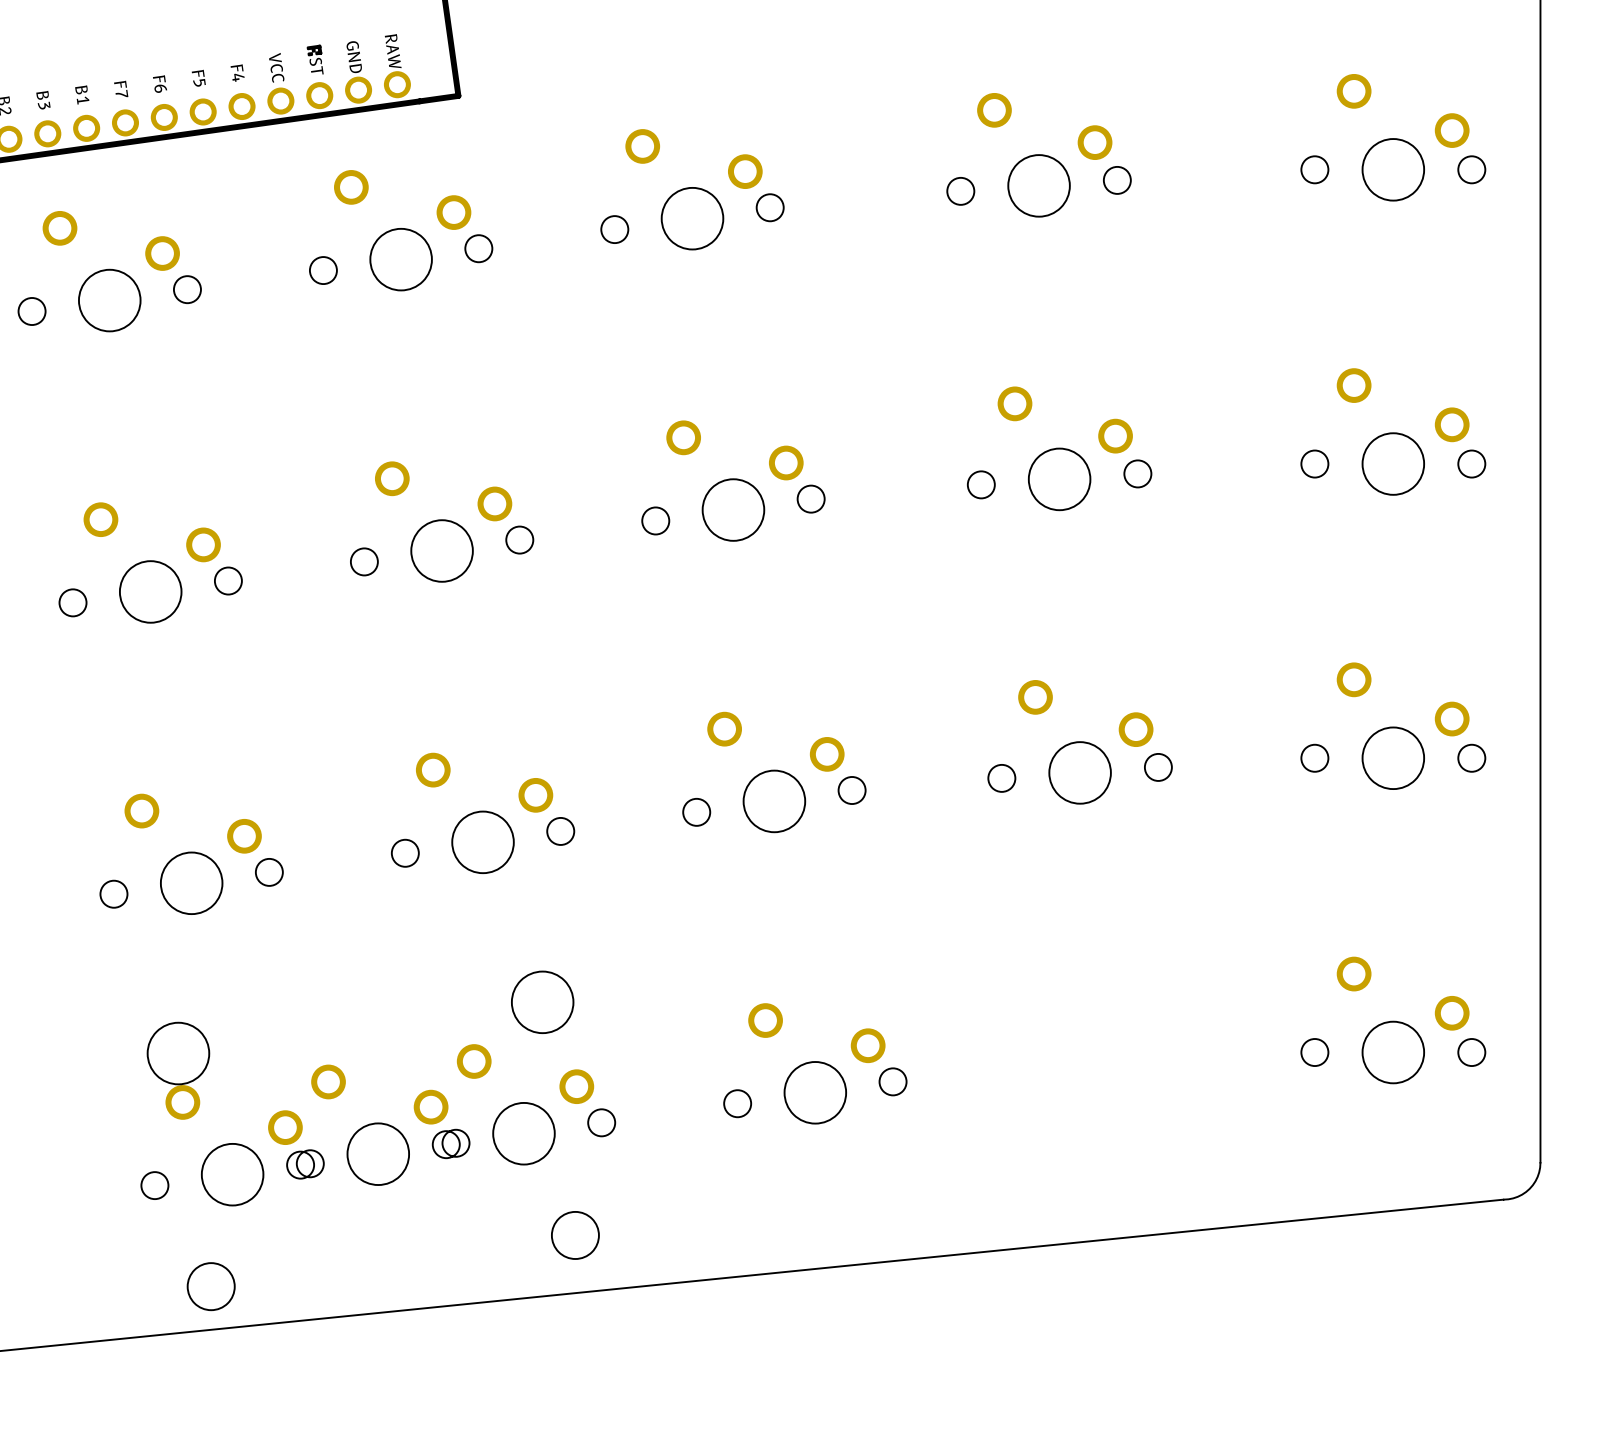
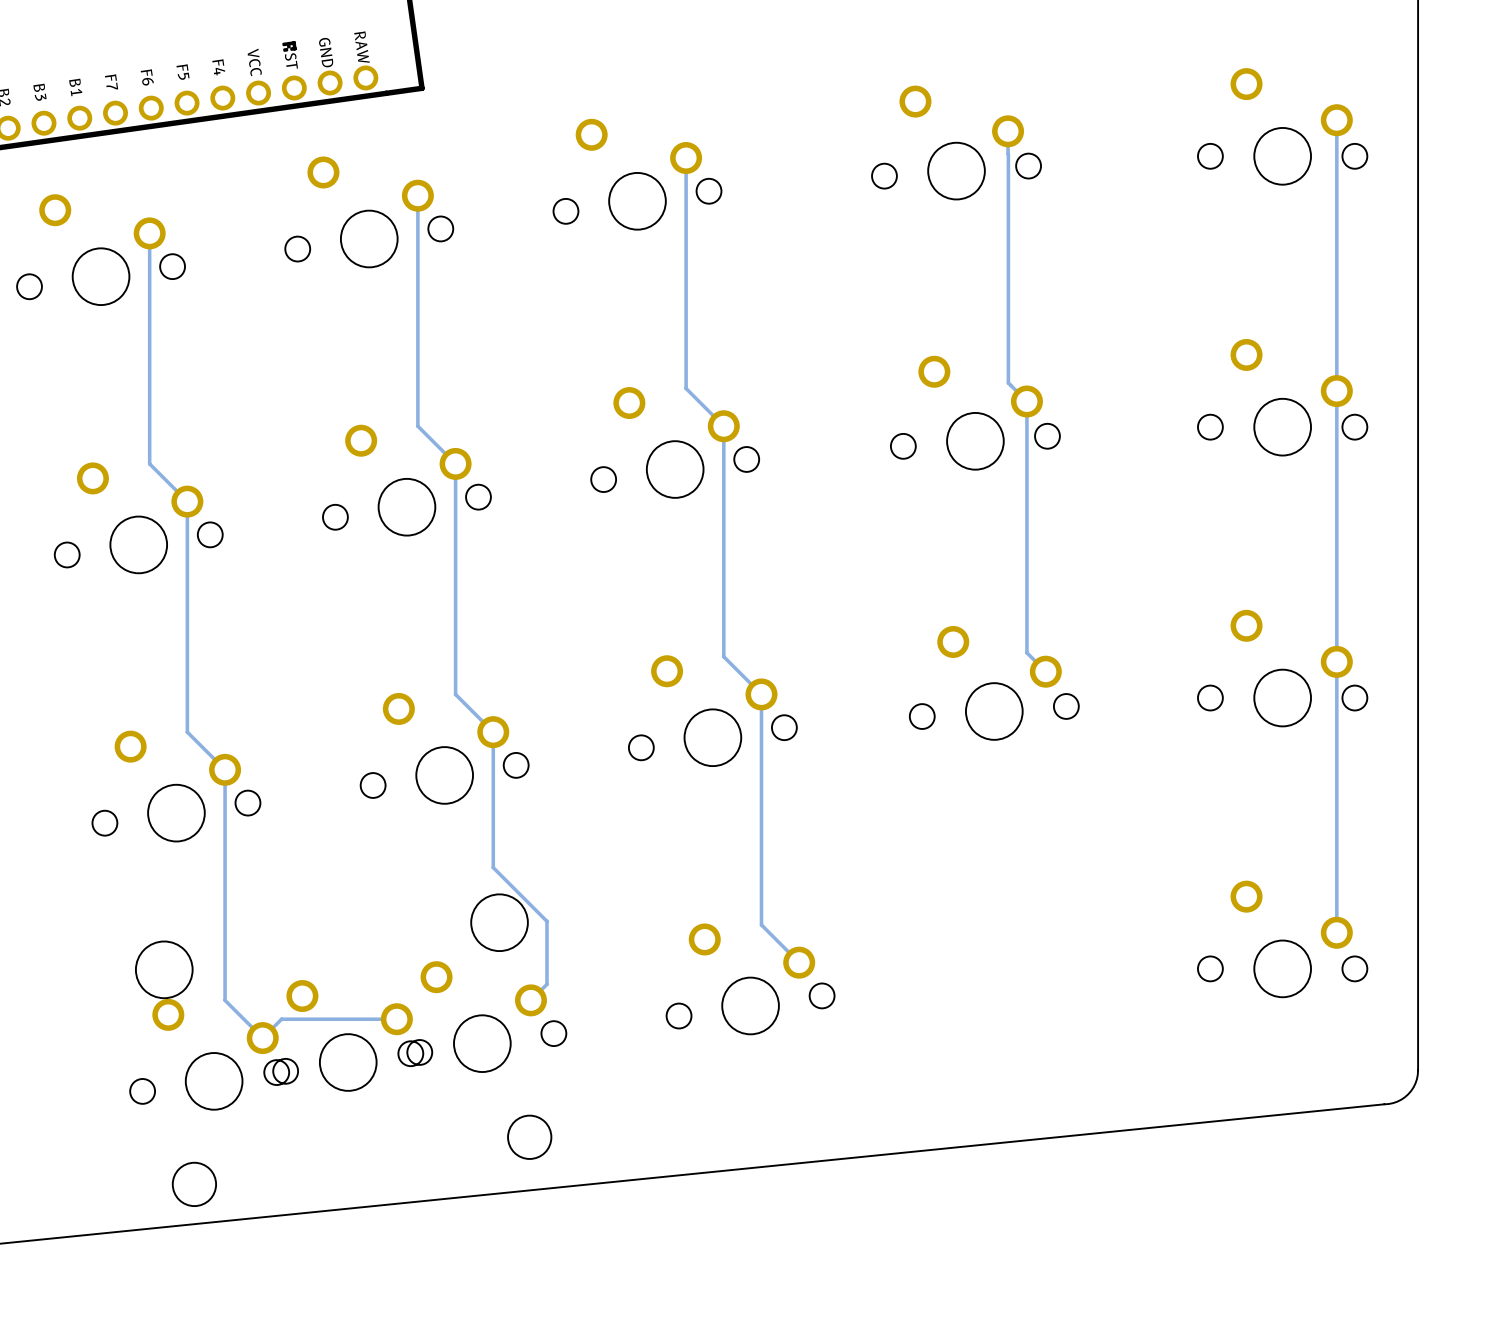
track: none -> (1336, 120) (1336, 932)
track: none -> (1008, 131) (1008, 382) (1026, 401) (1026, 652) (1045, 671)
track: none -> (686, 158) (686, 388) (723, 426) (723, 656) (761, 694) (761, 924) (799, 962)
track: none -> (417, 195) (417, 426) (455, 463) (455, 694) (493, 732) (493, 867) (546, 921) (546, 984) (530, 1000)
track: none -> (149, 233) (149, 463) (187, 501) (187, 732) (225, 769) (225, 1000) (262, 1038) (281, 1019) (396, 1019)

